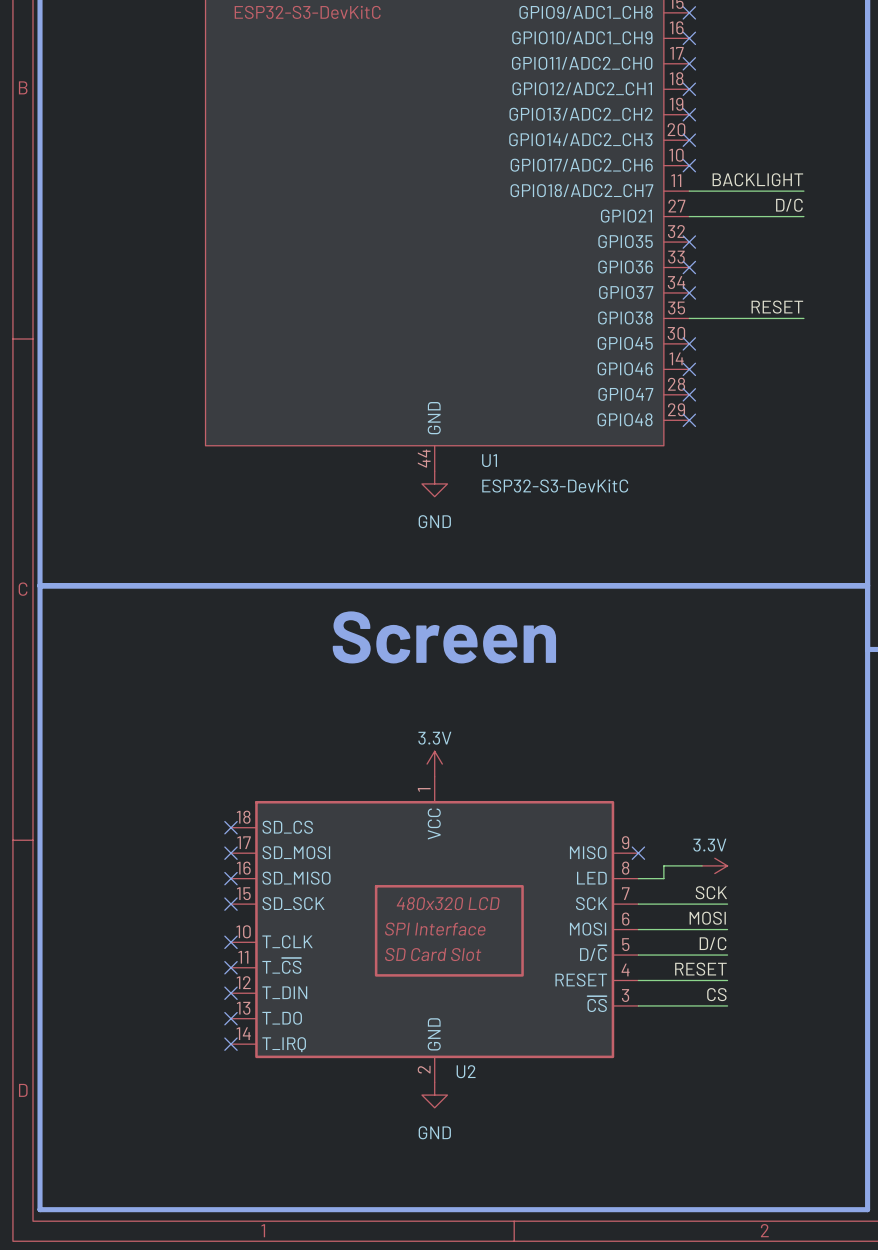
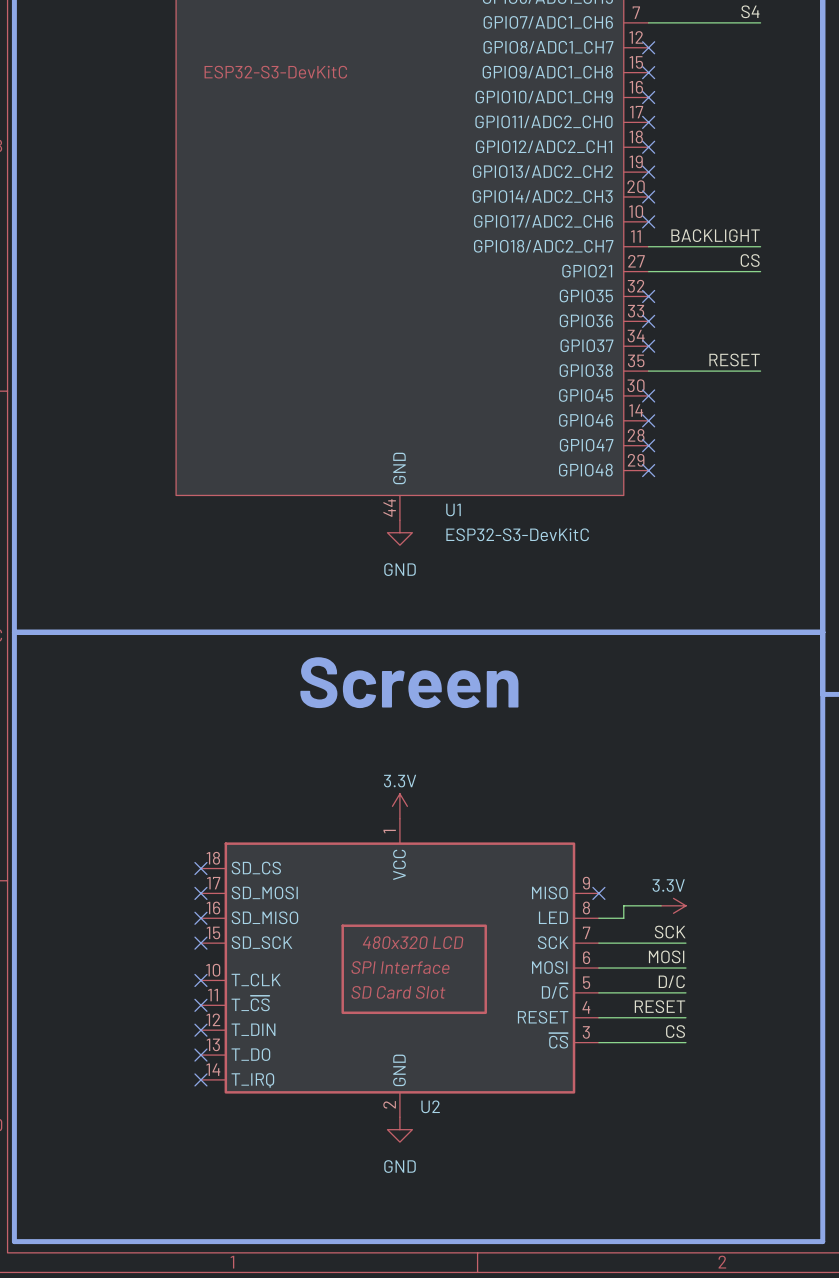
label: D/C (789, 205) -> CS (750, 260)

